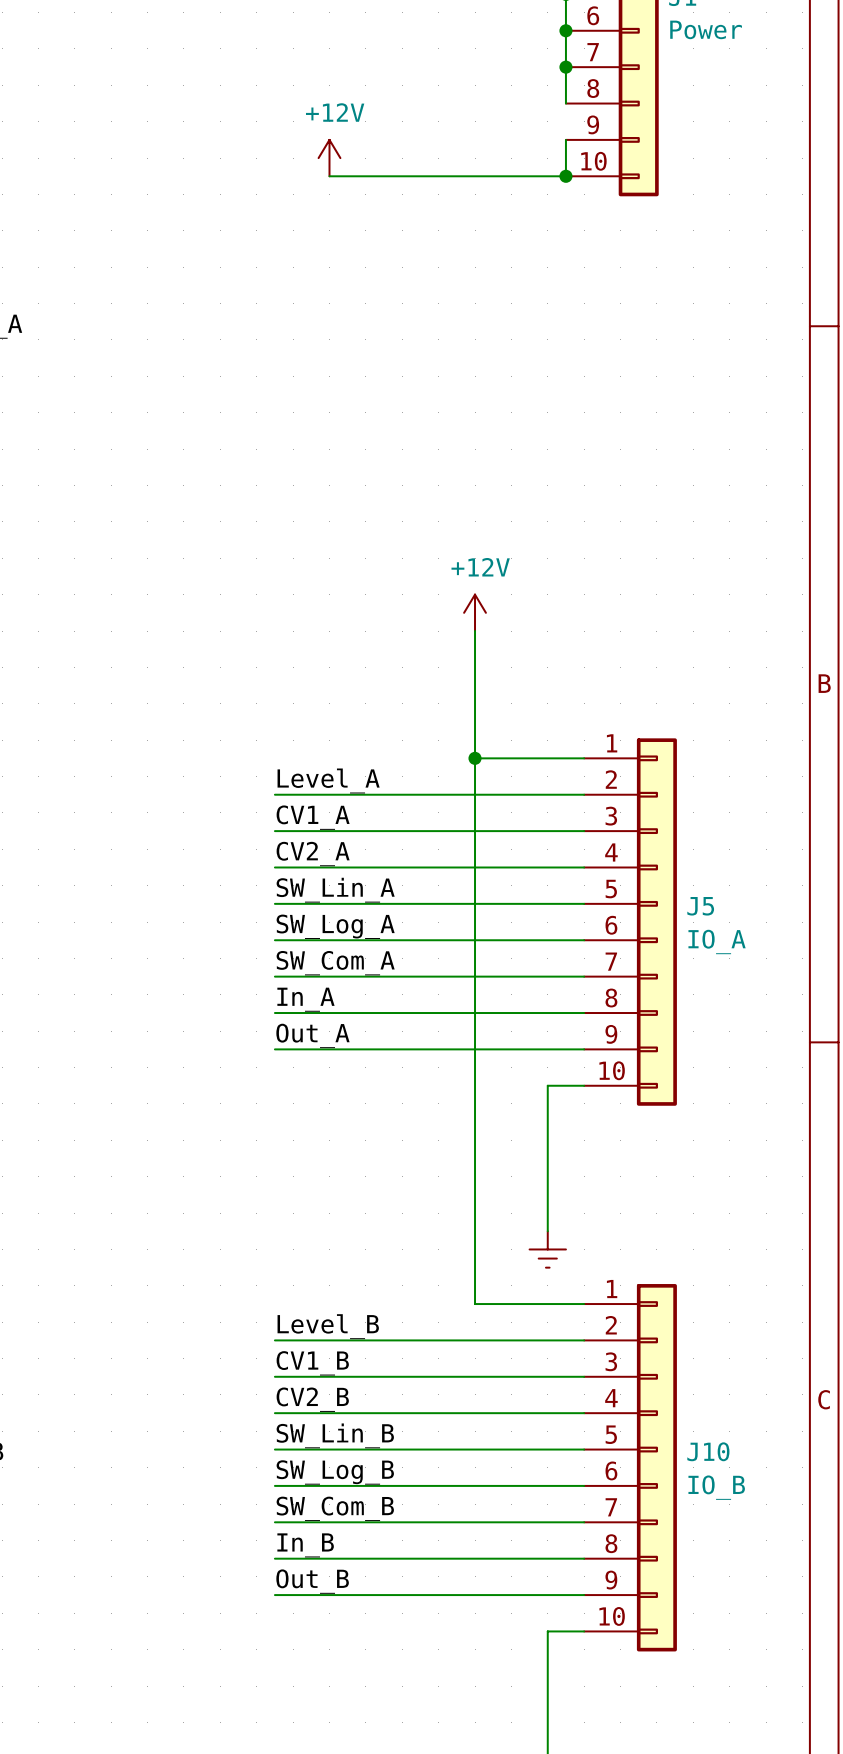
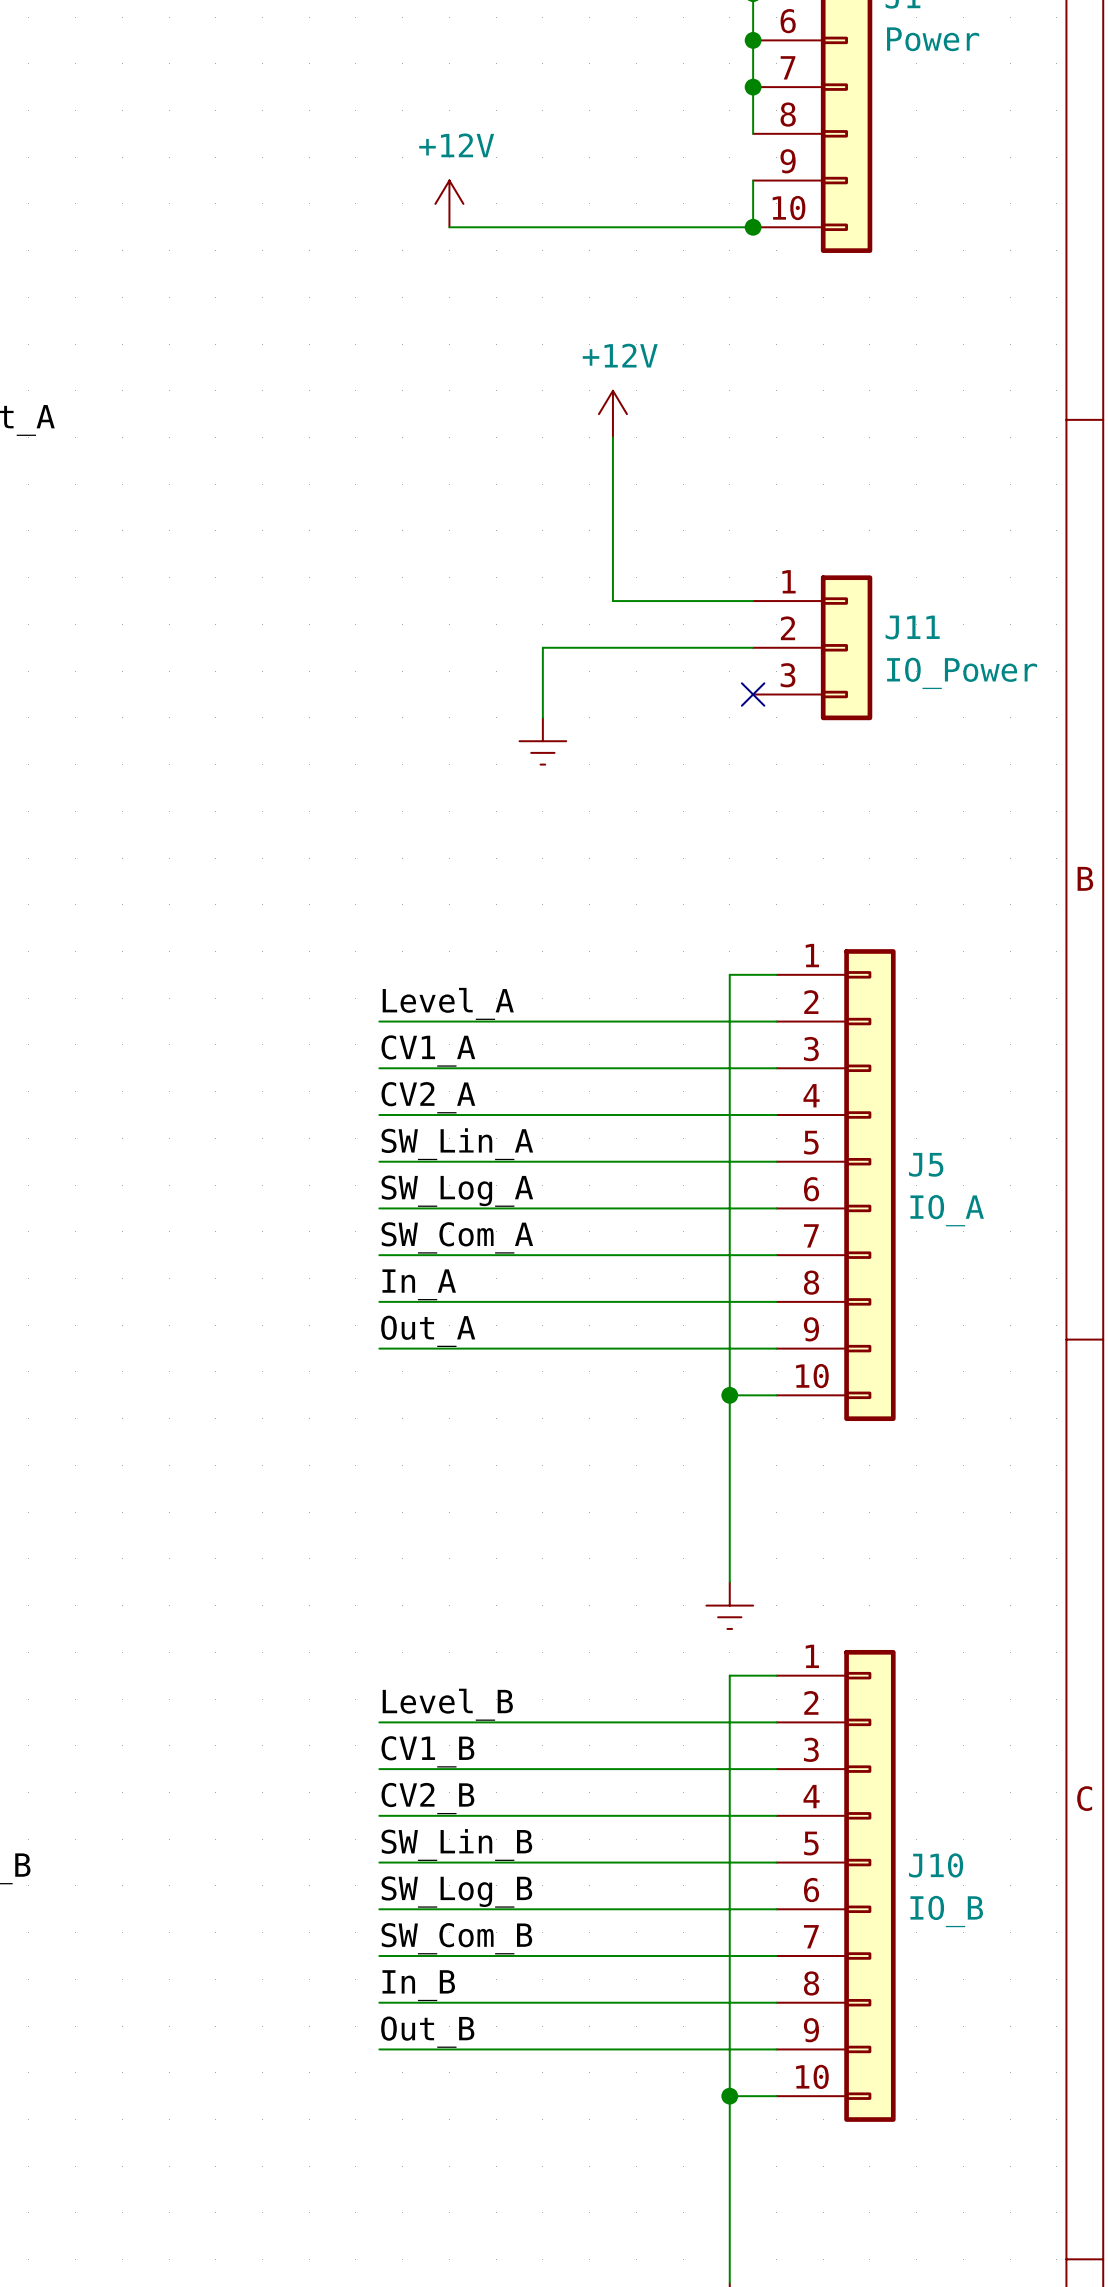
wire: none -> (612, 437) (612, 601) (753, 601)
wire: none -> (753, 647) (542, 647) (542, 717)
J11: none -> IO_Power (812, 647)
no-connect mark: none -> (753, 694)
power symbol: none -> (542, 741)
power symbol position: +12V (475, 612) -> +12V (612, 414)
wire: (475, 631) (475, 1304) (547, 1304) -> (729, 2096) (729, 1675)
wire: (475, 758) (547, 758) -> (729, 1395) (729, 974)
junction: (475, 758) -> none
junction: none -> (729, 1395)
junction: none -> (729, 2096)

